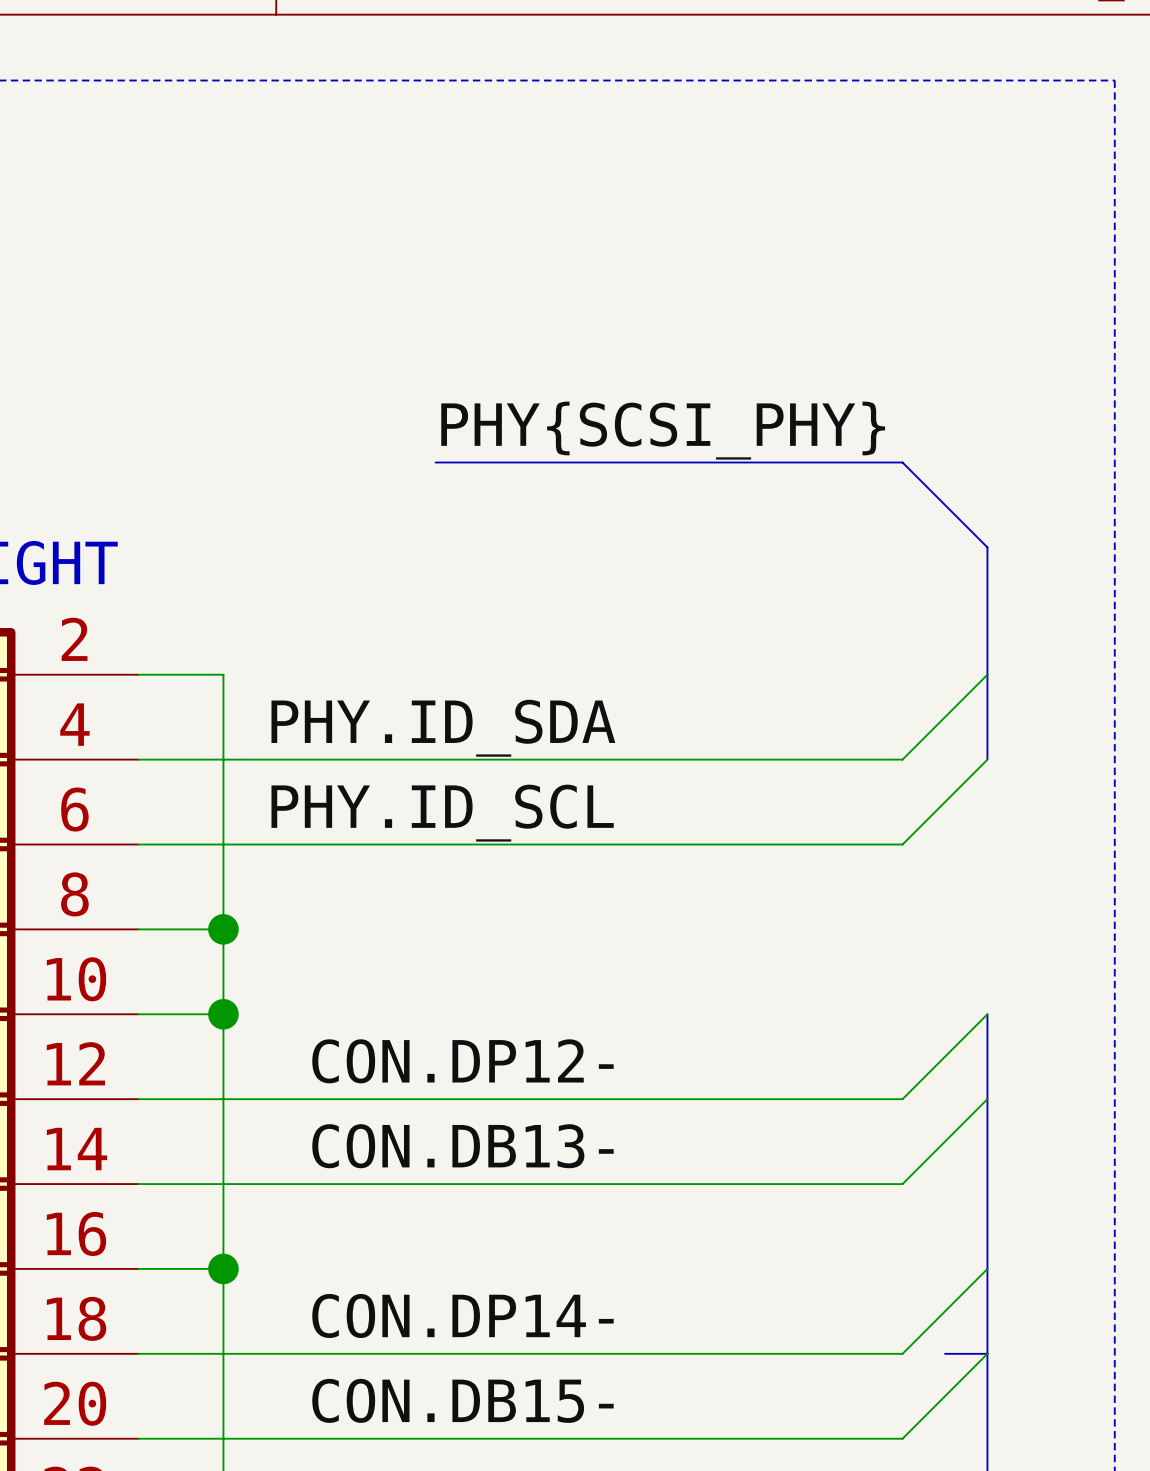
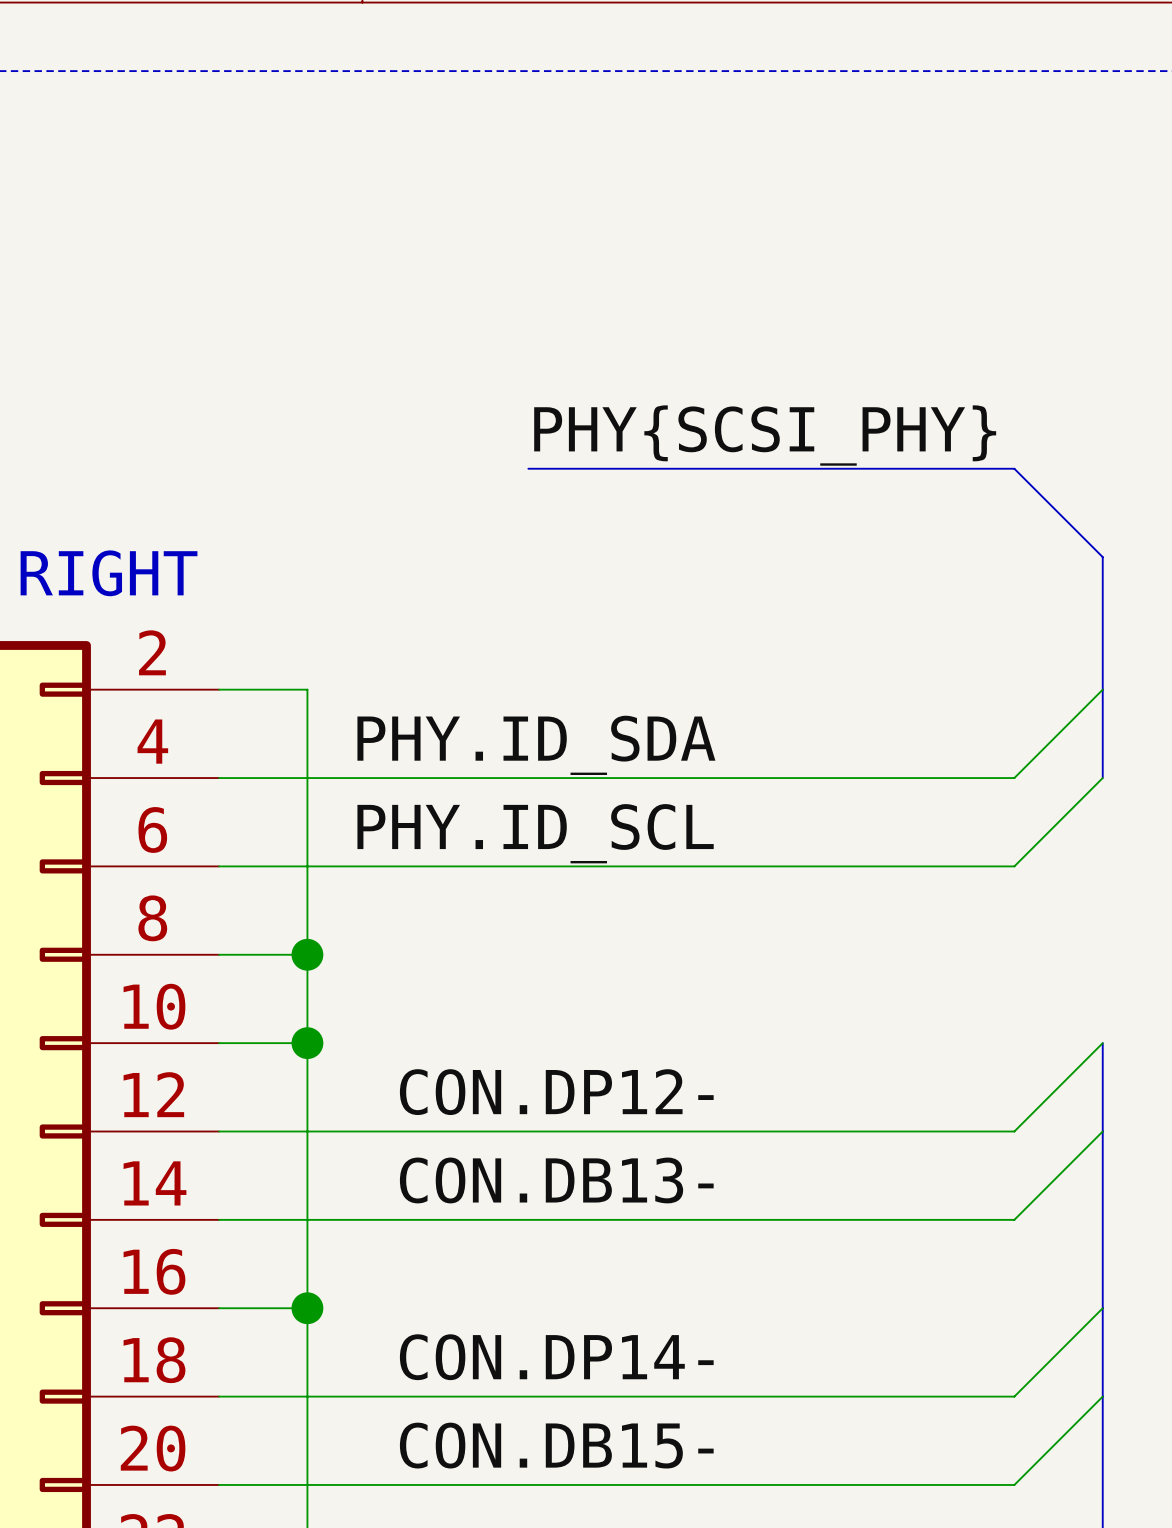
bus: (944, 1353) (987, 1353) -> none

